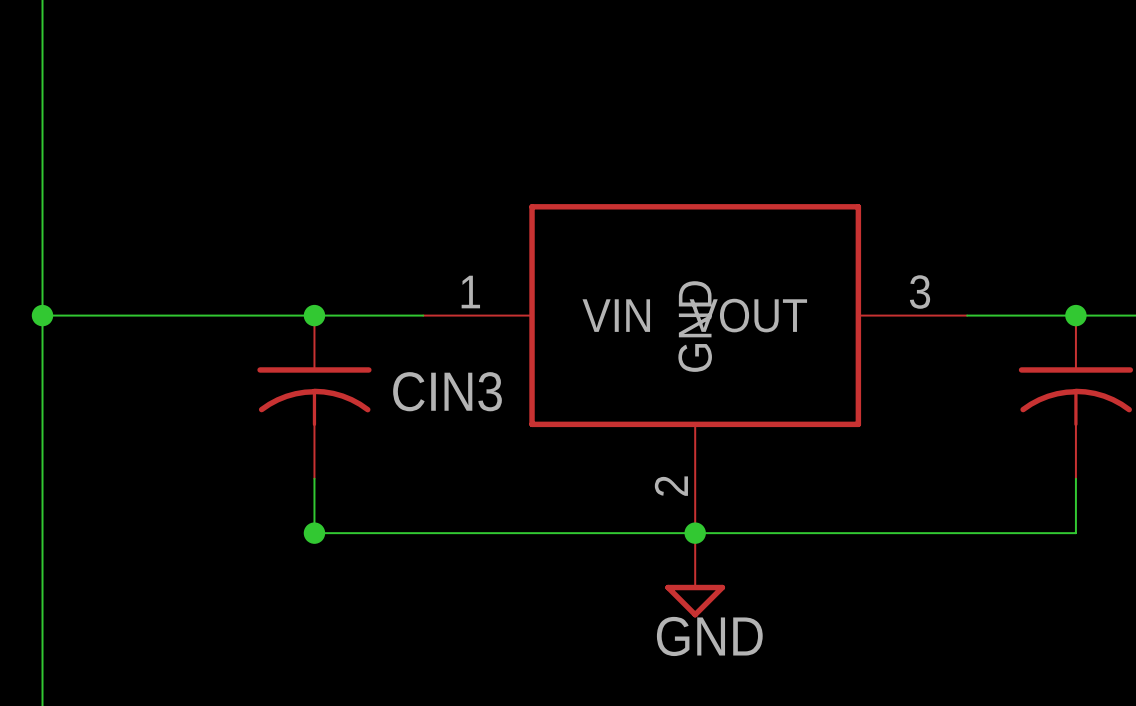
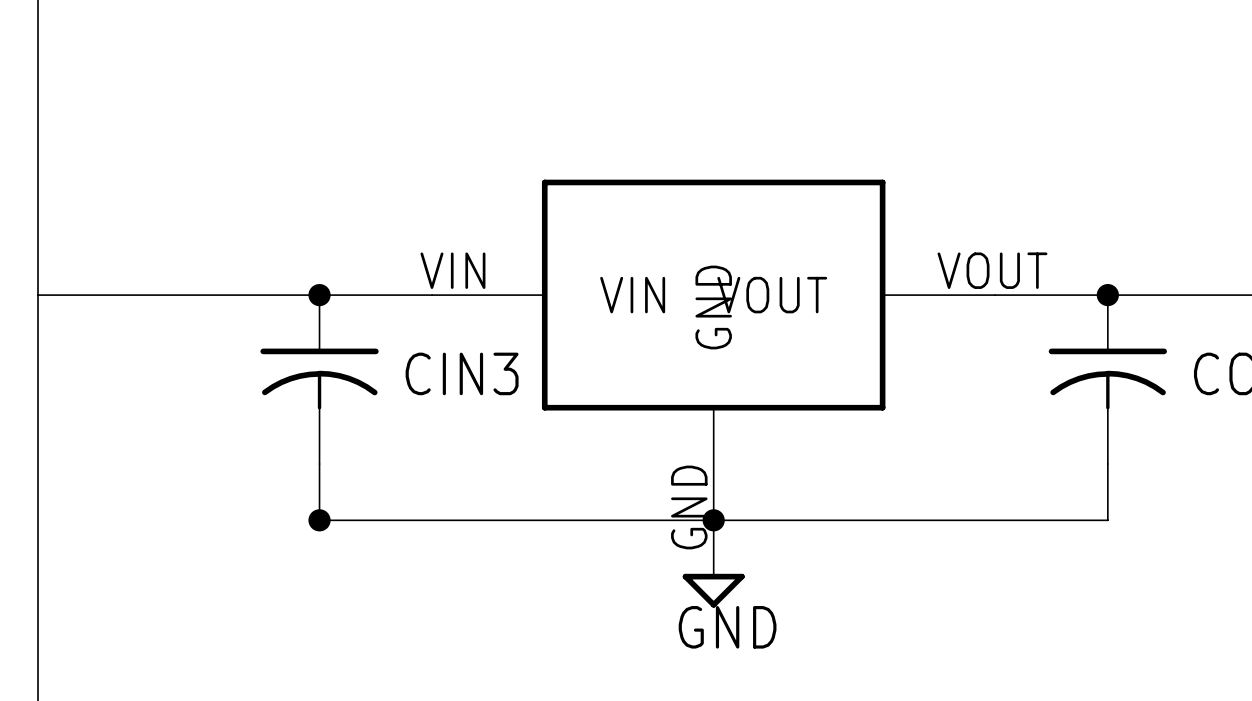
part pin number: 1 (470, 292) -> VIN (452, 270)
part pin number: 3 (920, 292) -> VOUT (992, 270)
junction: (42, 315) -> none
part pin number: 2 (671, 486) -> GND (689, 507)

